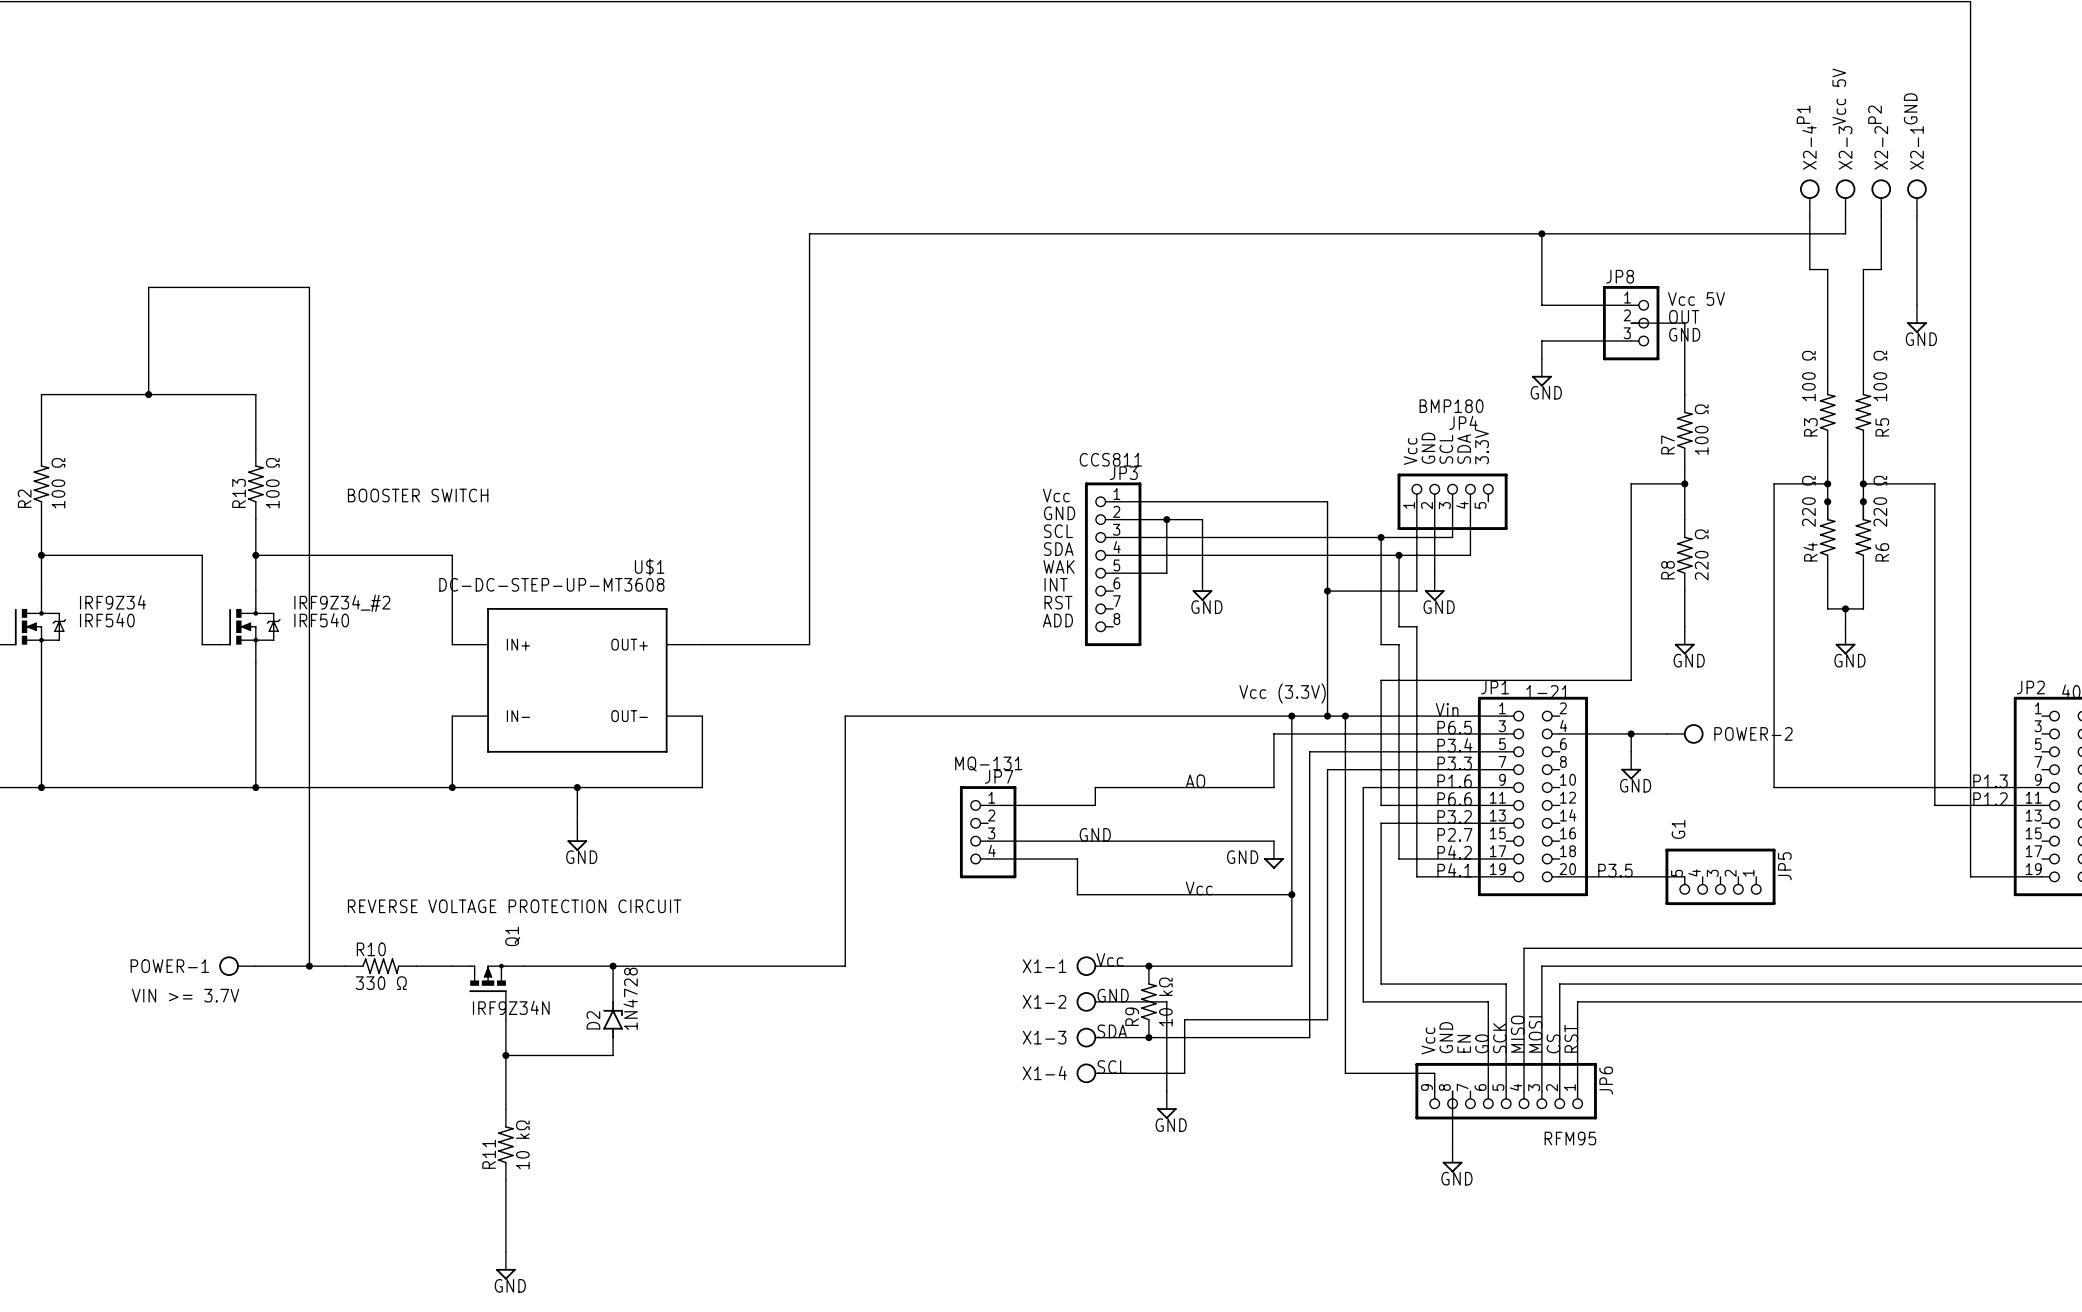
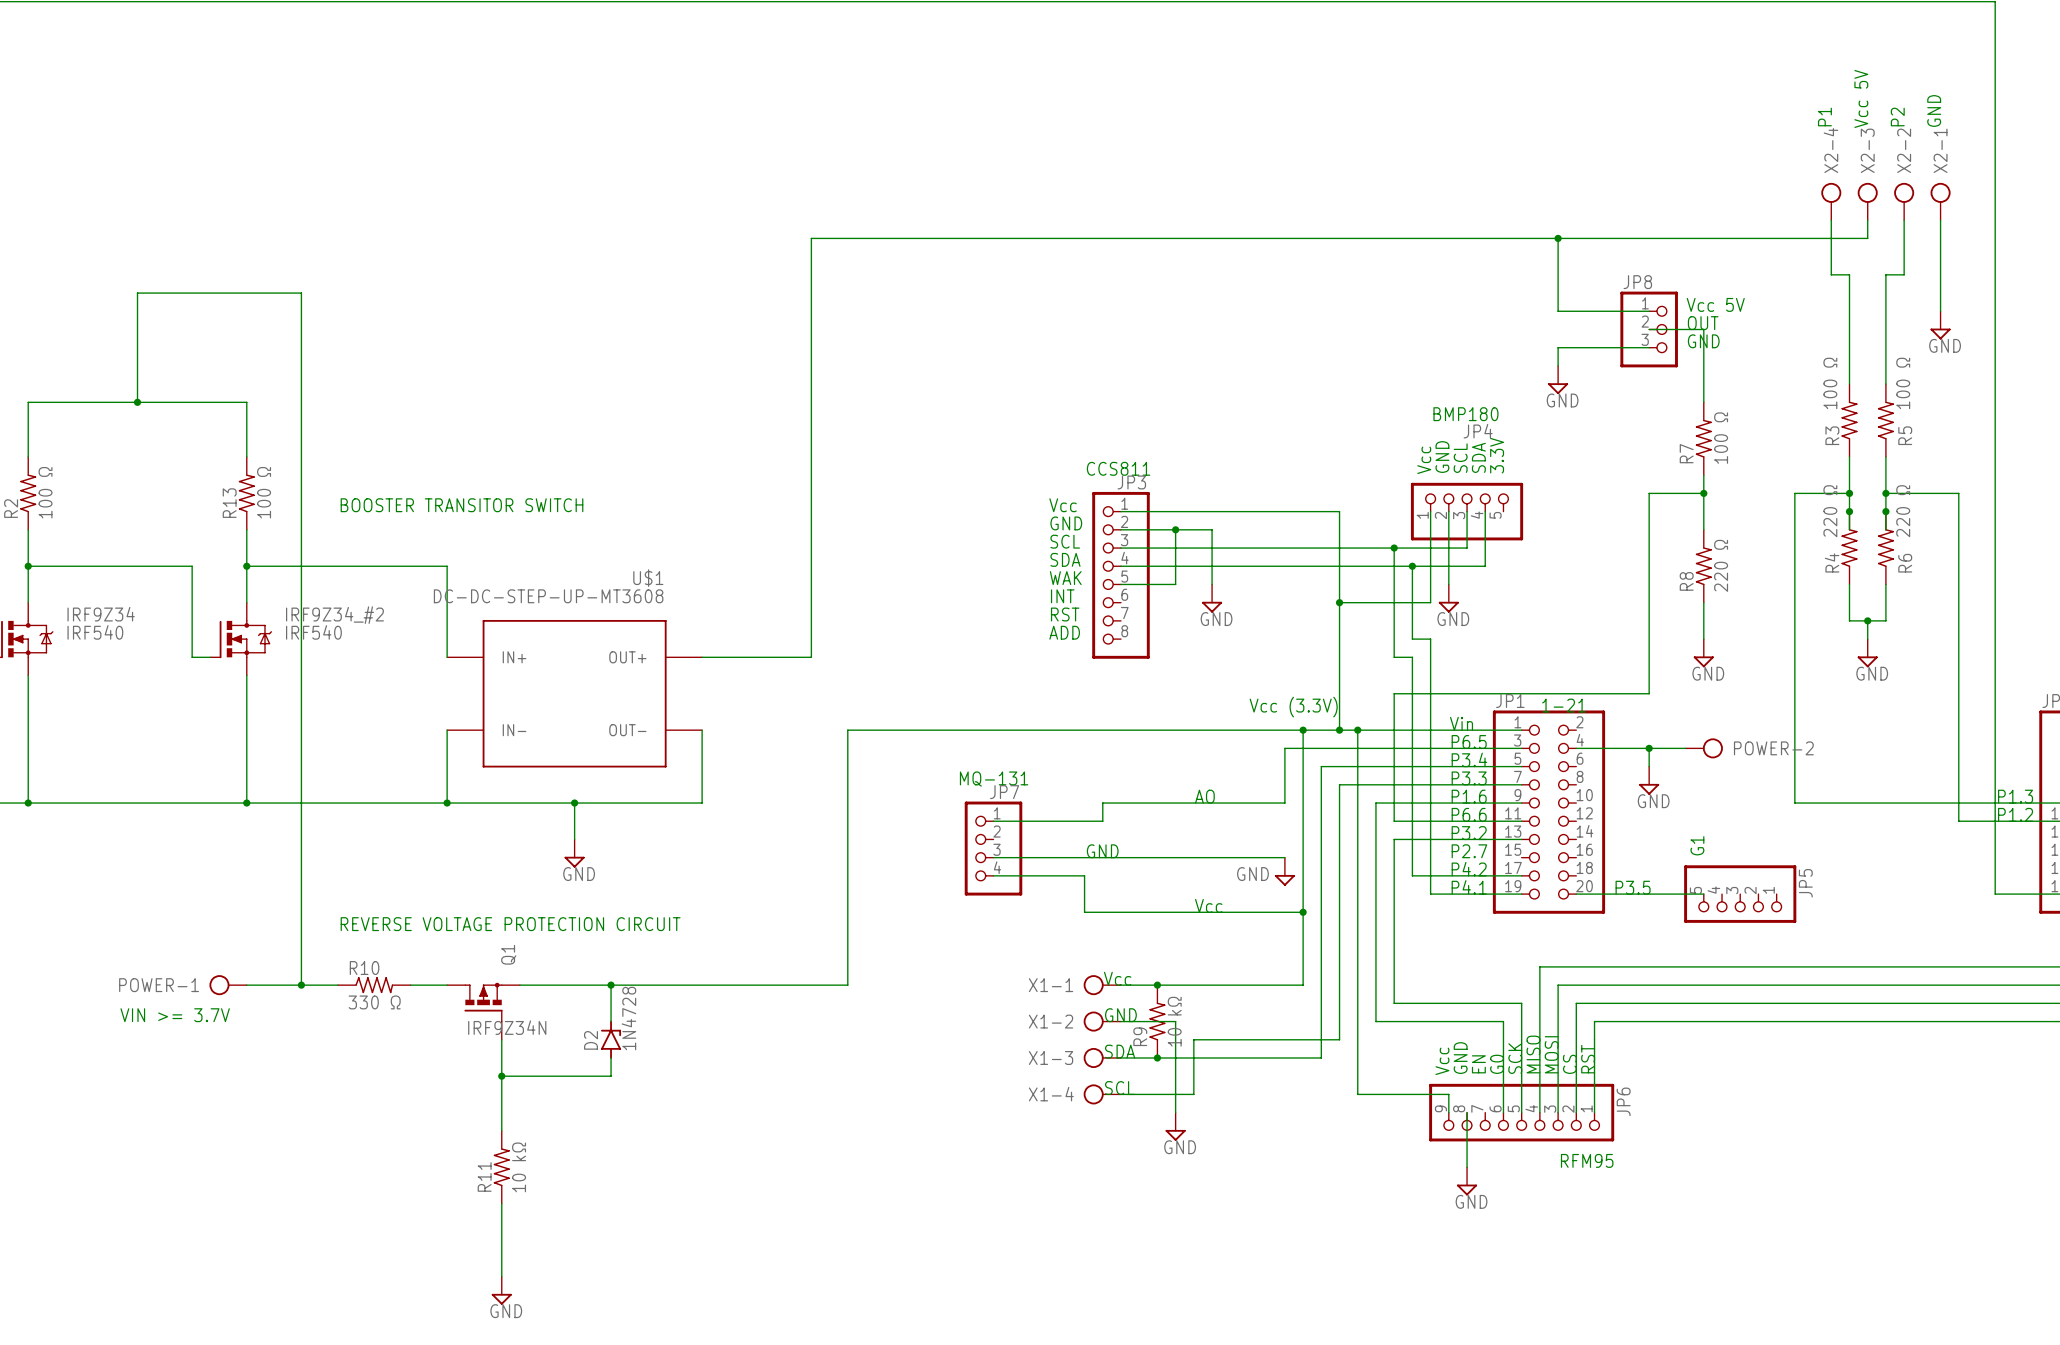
text: BOOSTER SWITCH (418, 495) -> BOOSTER TRANSITOR SWITCH (462, 505)

